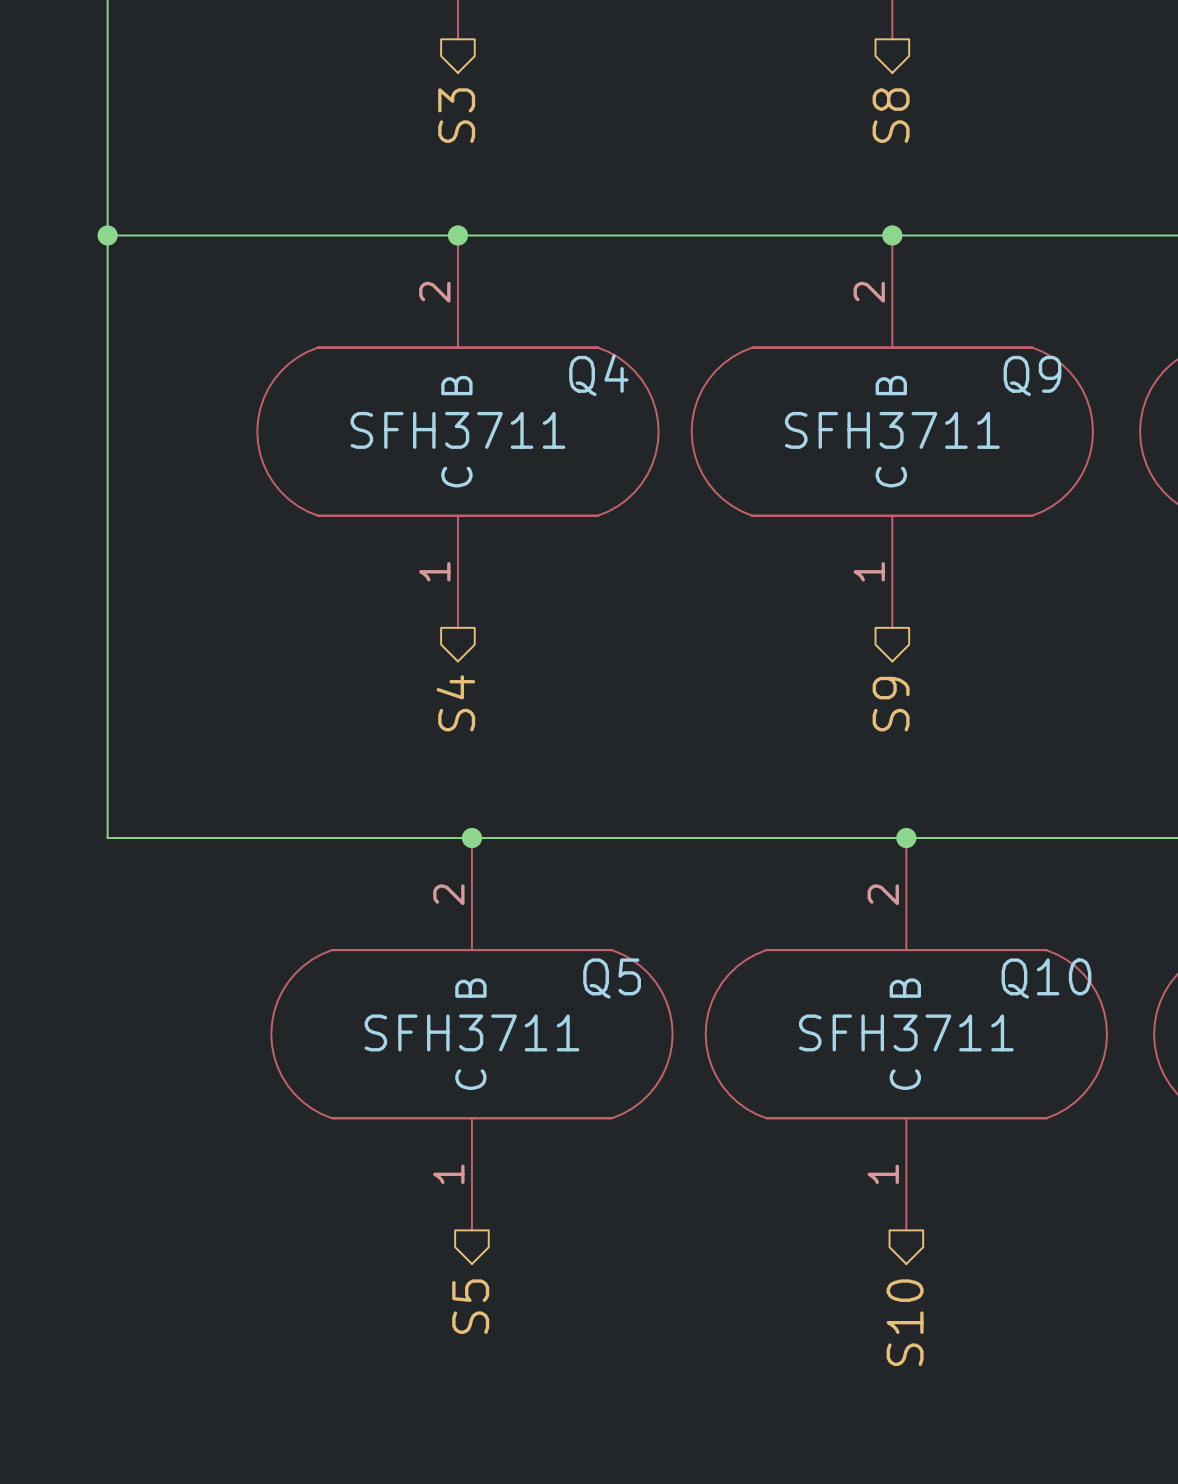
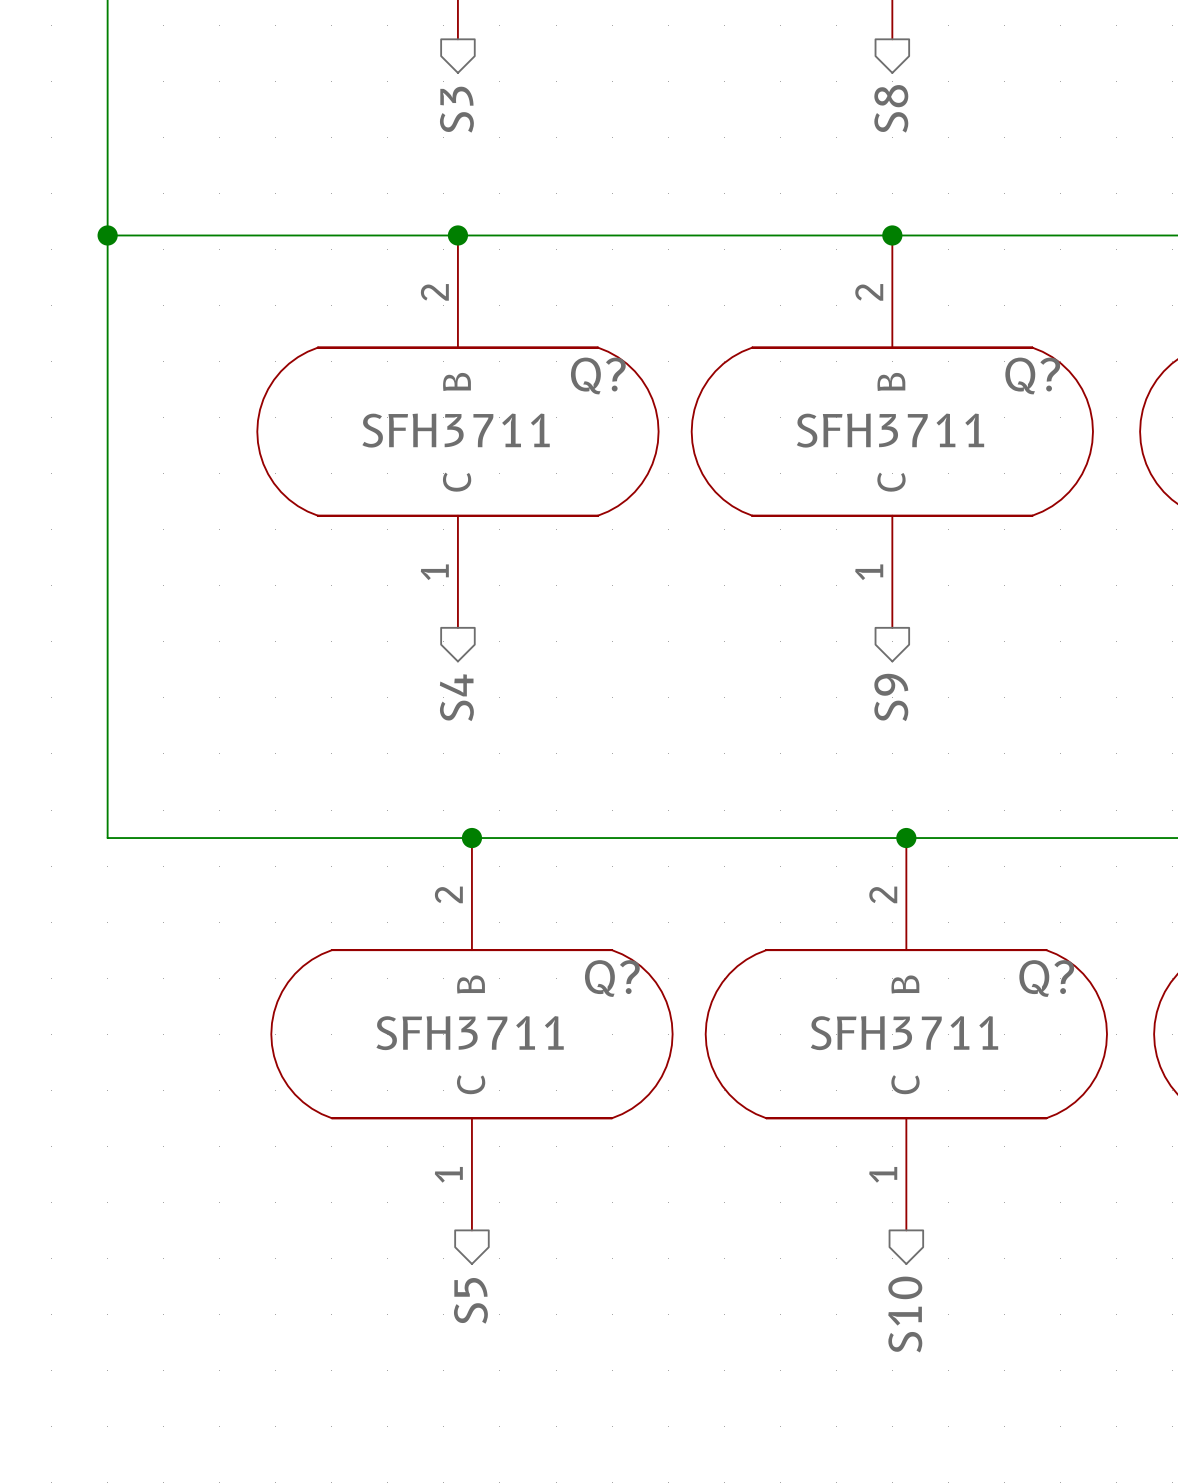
Q4 name: Q4 (598, 375) -> Q? (598, 375)
Q9 name: Q9 (1032, 375) -> Q? (1032, 375)
Q5 name: Q5 (612, 978) -> Q? (612, 978)
Q10 name: Q10 (1046, 978) -> Q? (1046, 978)

